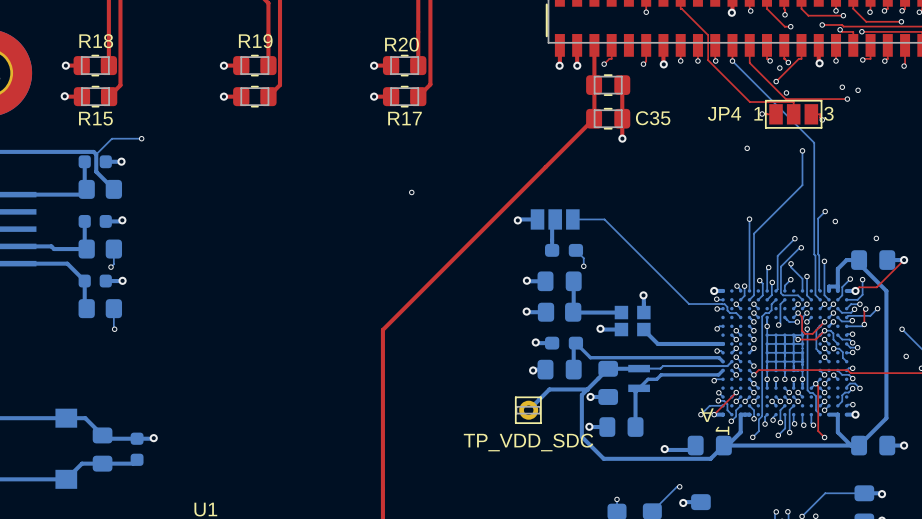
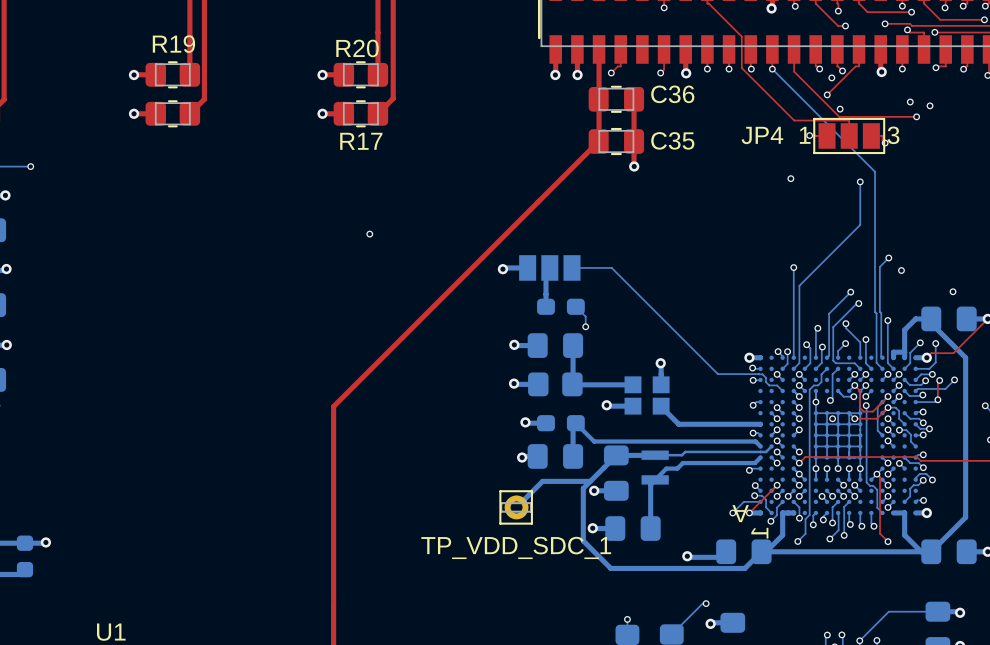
C36 name: none -> C36 (672, 94)
via: none -> (832, 418)
TP_VDD_SDC name: TP_VDD_SDC (528, 442) -> TP_VDD_SDC_1 (516, 547)

